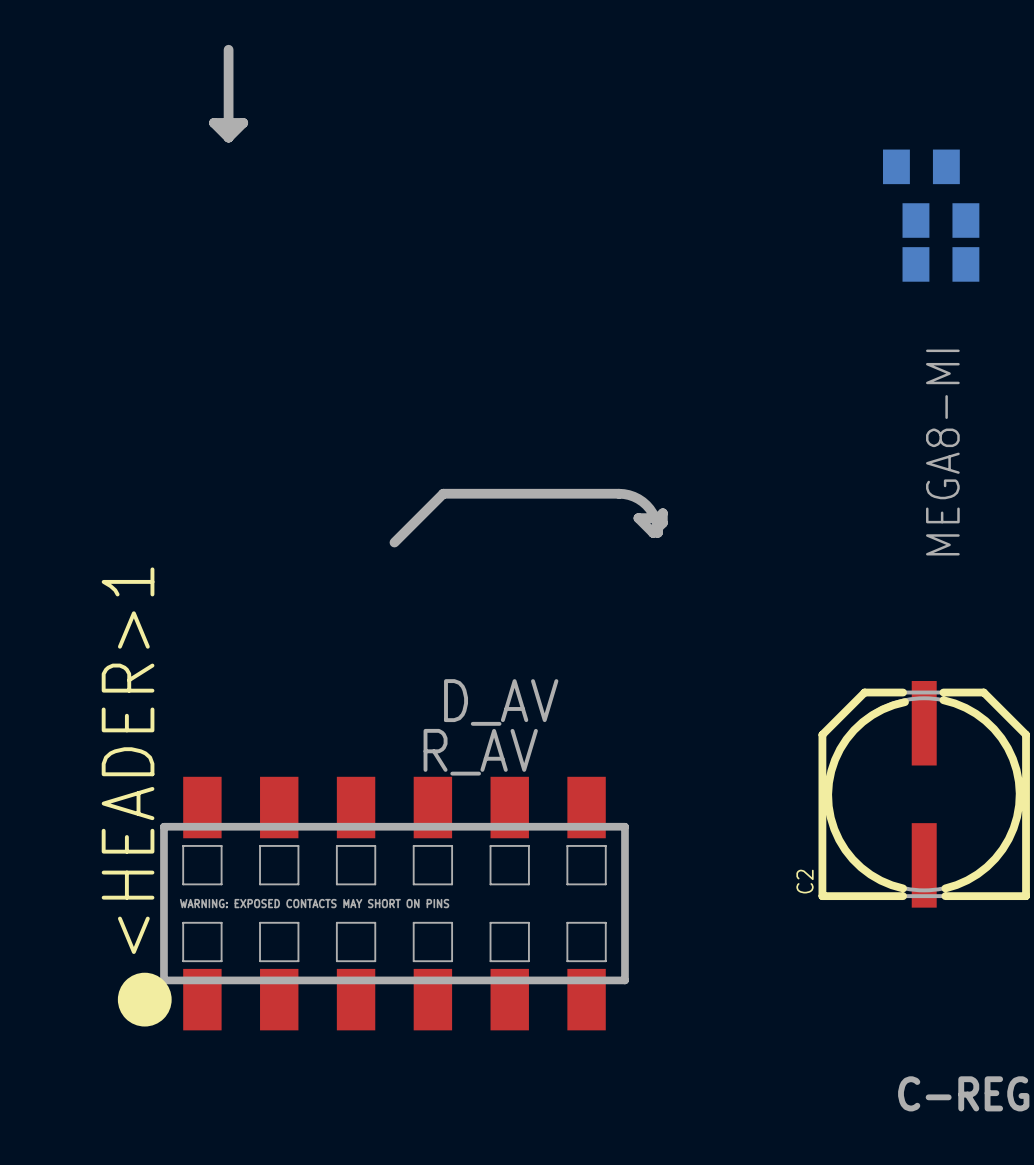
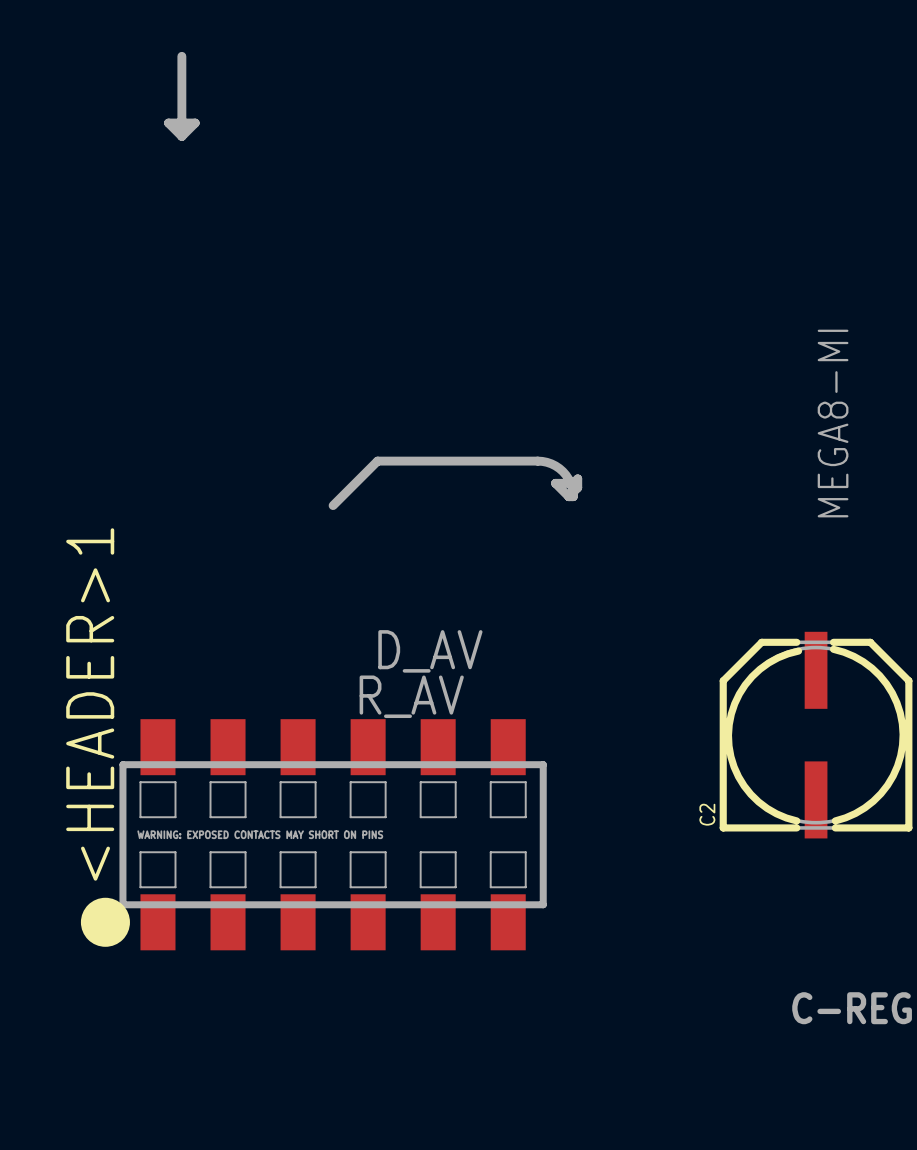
part: (921, 166) -> none
part: (940, 220) -> none
part: (940, 264) -> none

